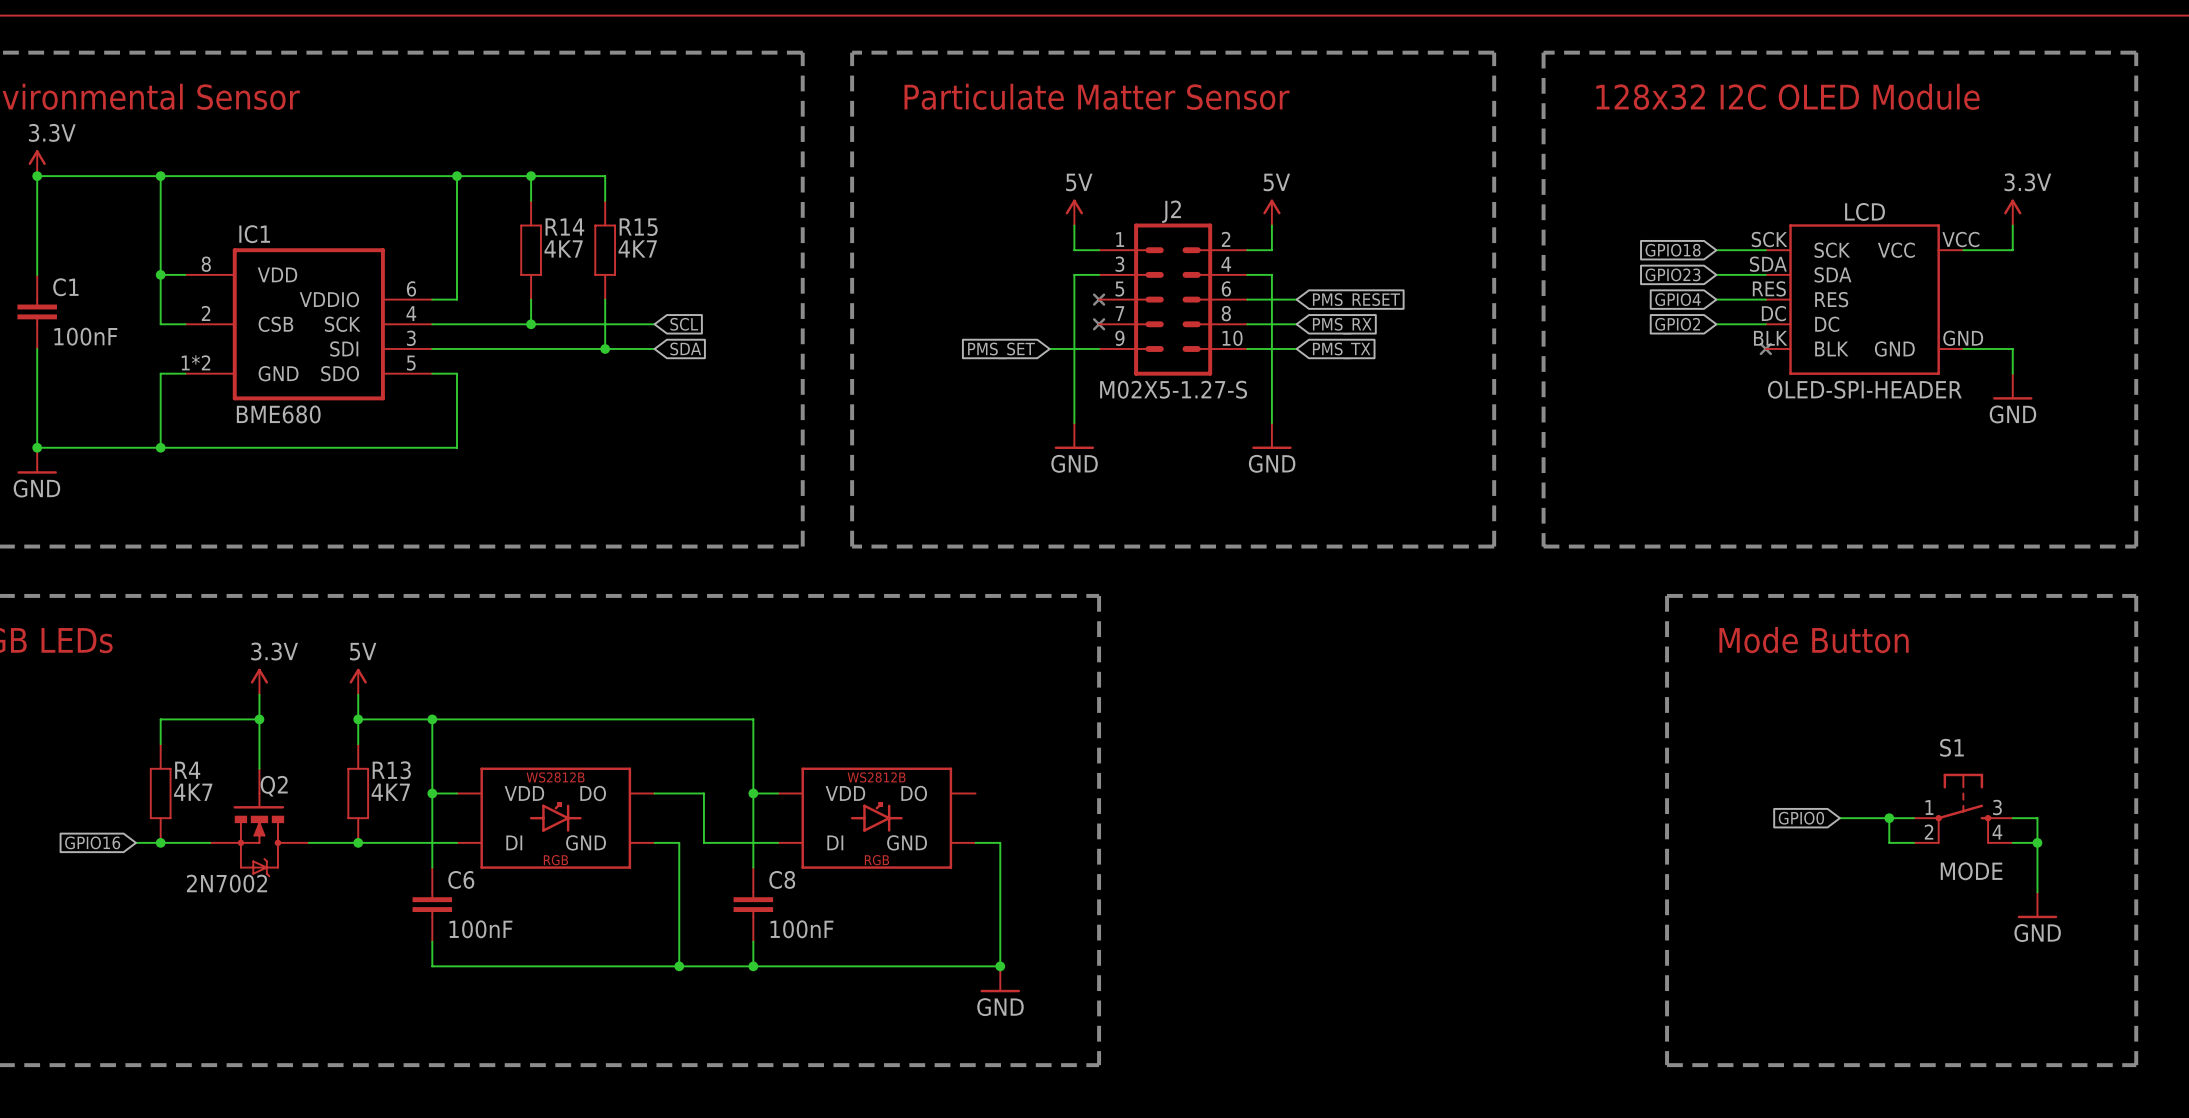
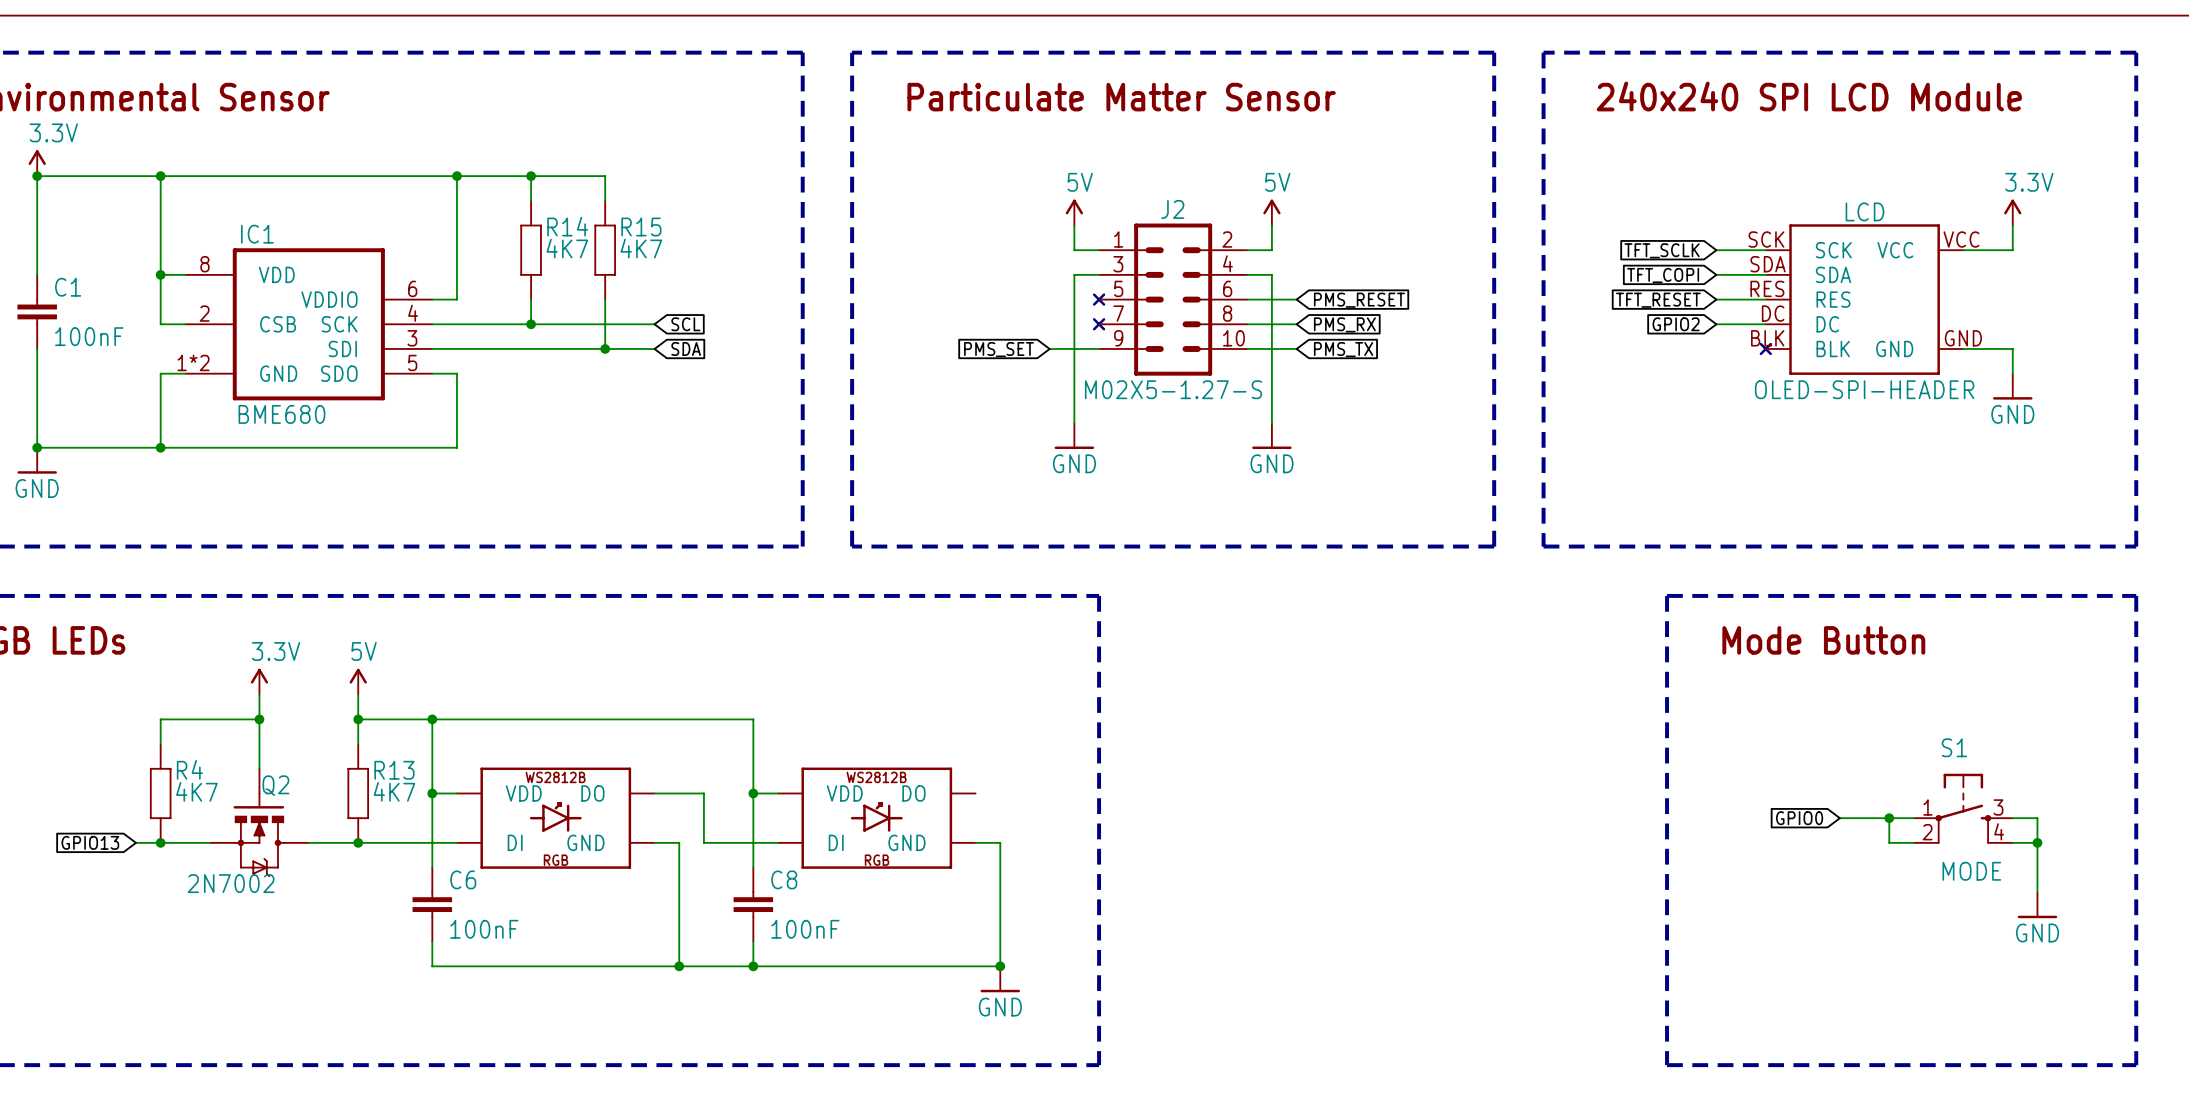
text: 128x32 I2C OLED Module (1787, 96) -> 240x240 SPI LCD Module (1809, 96)
global label: GPIO18 (1673, 250) -> TFT_SCLK (1662, 250)
global label: GPIO23 (1672, 274) -> TFT_COPI (1663, 275)
global label: GPIO4 (1678, 299) -> TFT_RESET (1658, 300)
global label: GPIO16 (92, 842) -> GPIO13 (90, 842)

